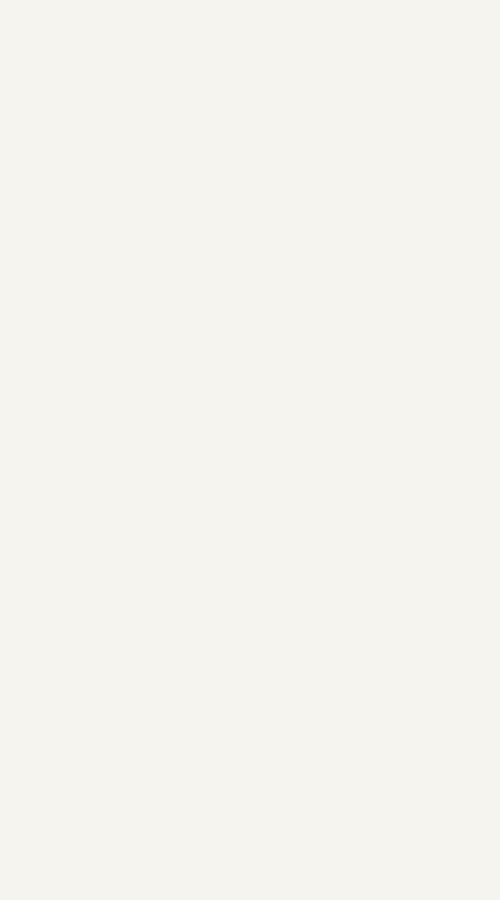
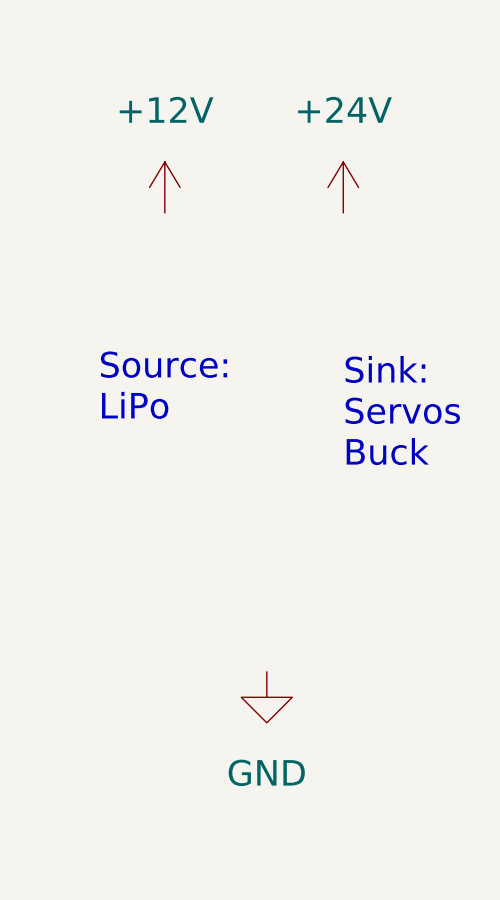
power symbol: none -> +12V (164, 187)
power symbol: none -> +24V (343, 187)
text: none -> Source: (163, 364)
text: none -> Sink: (385, 369)
text: none -> LiPo (135, 405)
text: none -> Servos (402, 410)
text: none -> Buck (387, 451)
power symbol: none -> GND (266, 697)

